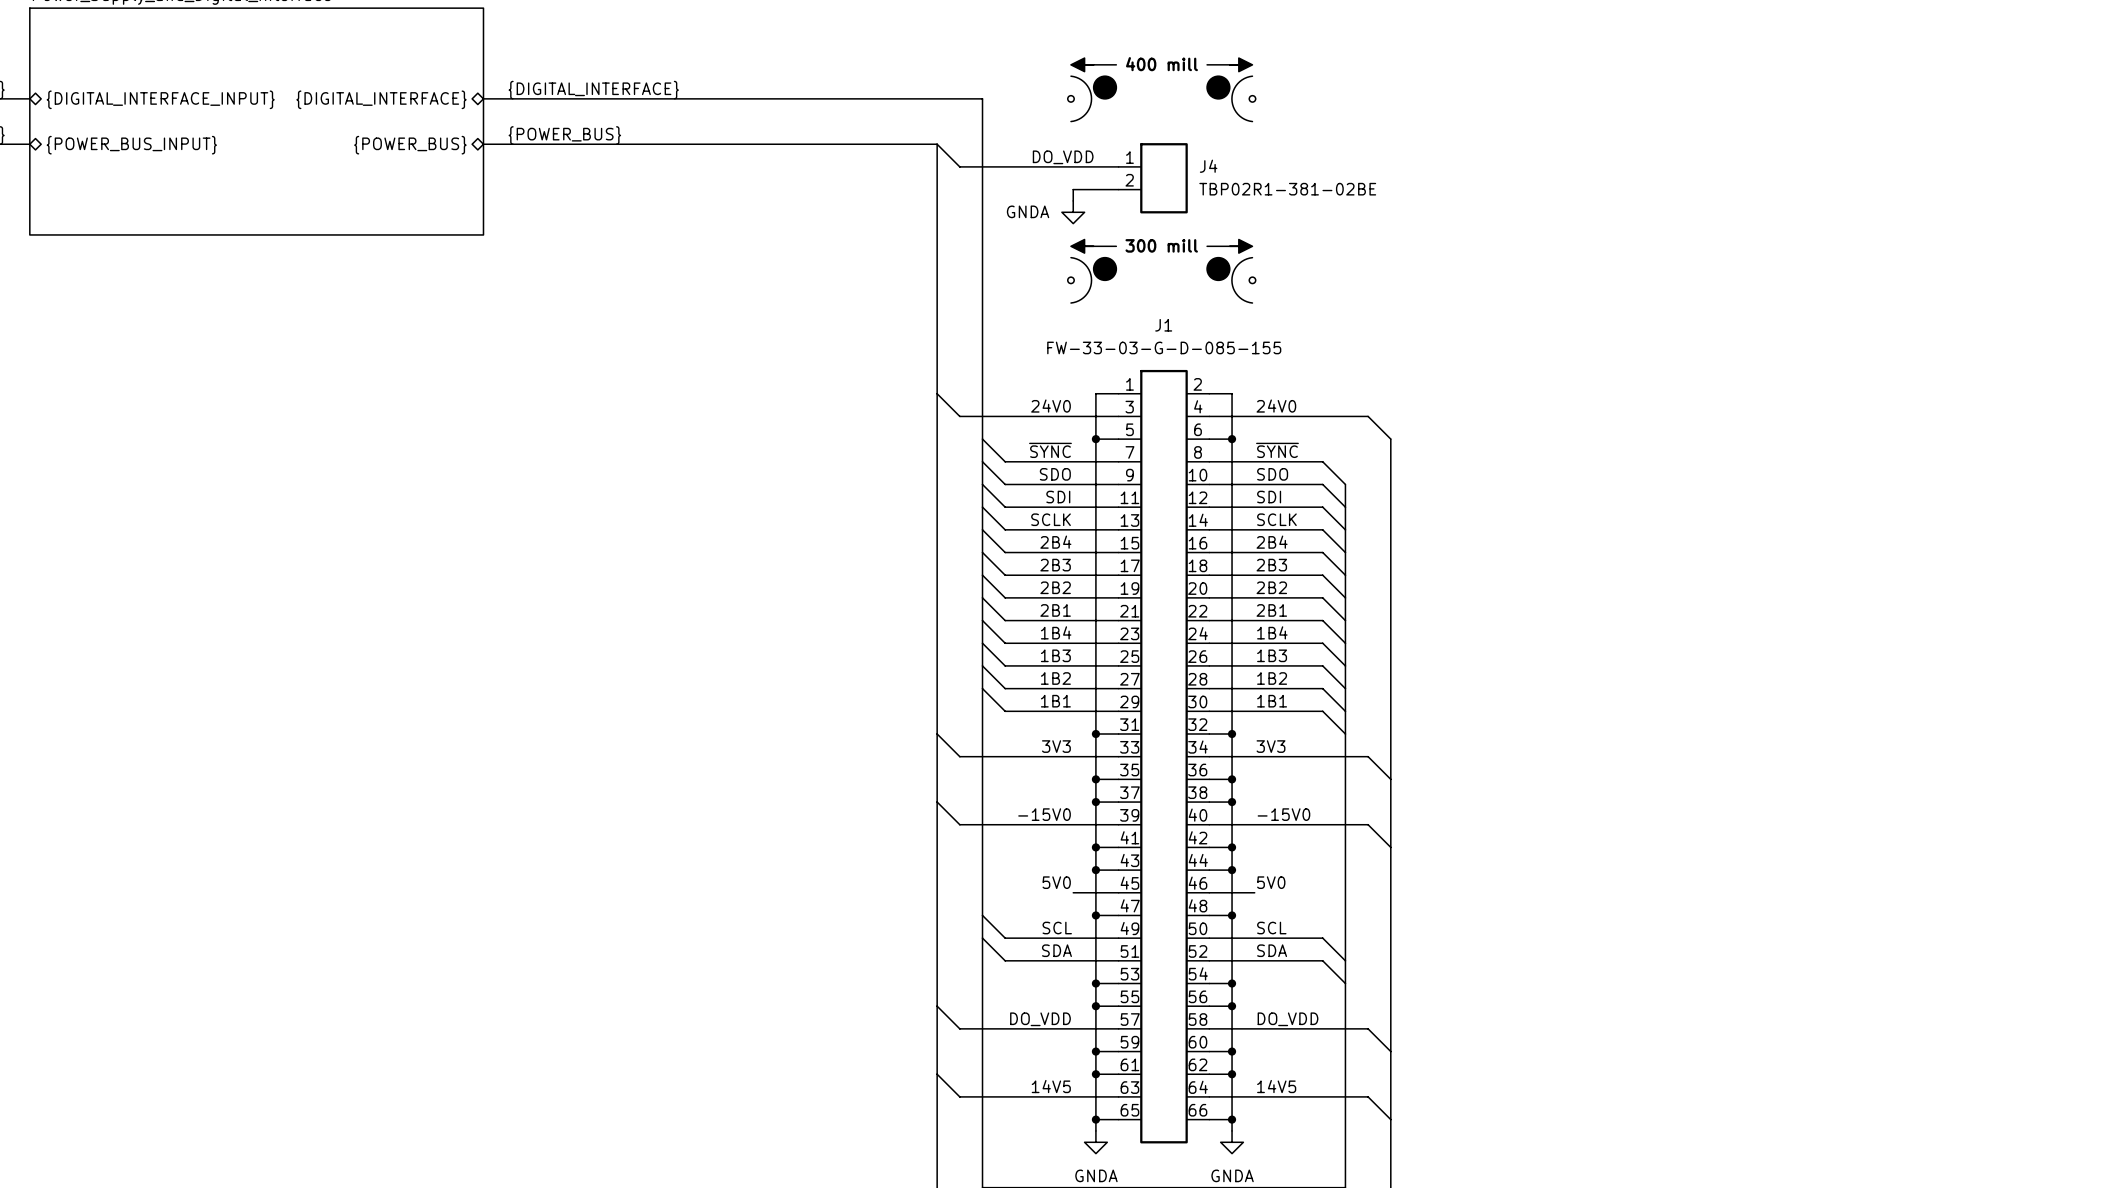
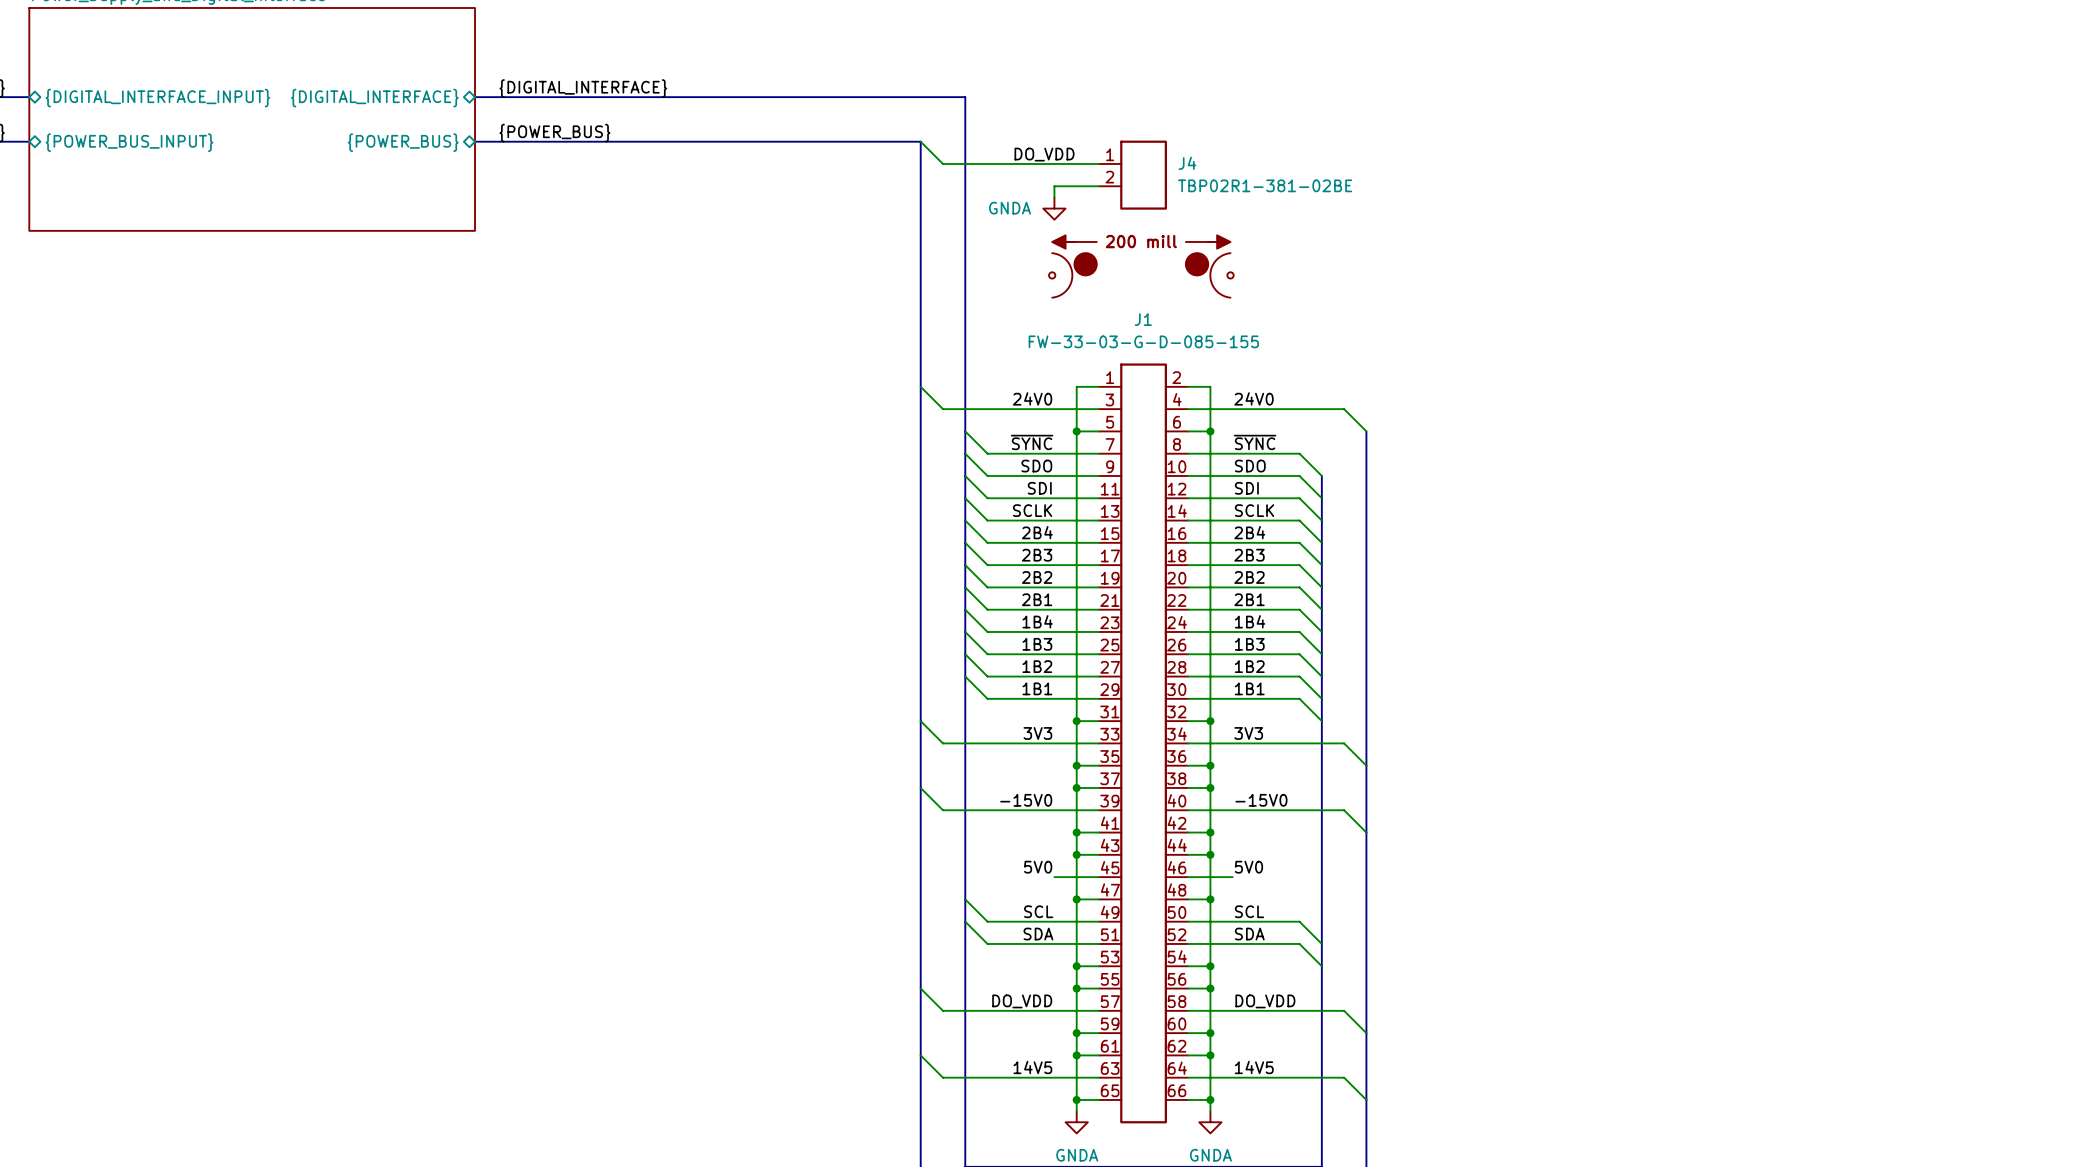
part: (1161, 89) -> none
part text: 300 mill (1161, 245) -> 200 mill (1141, 241)

